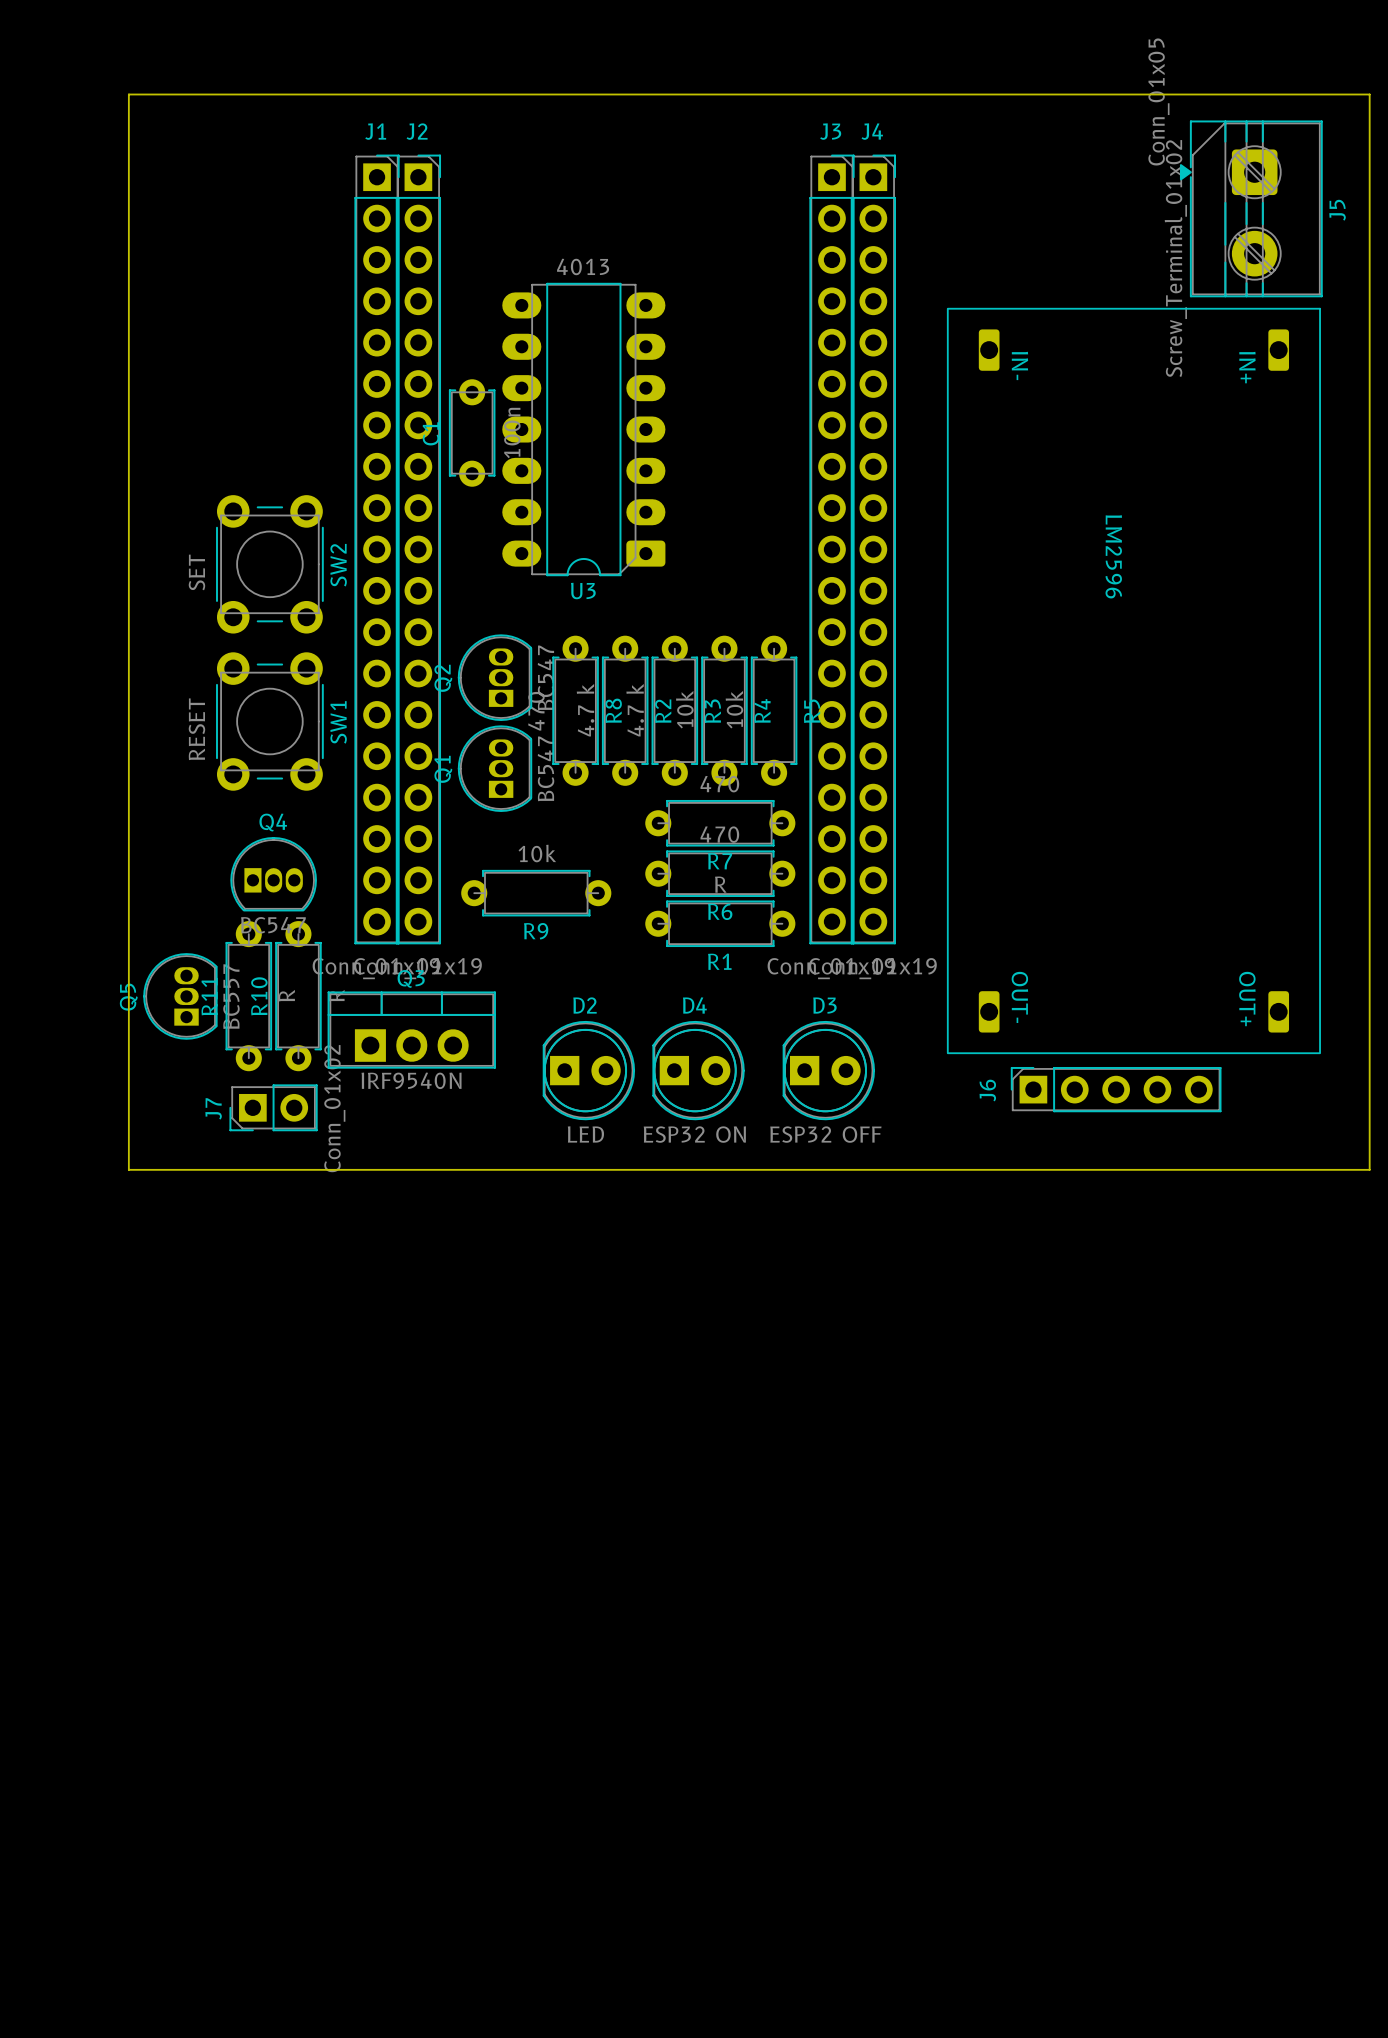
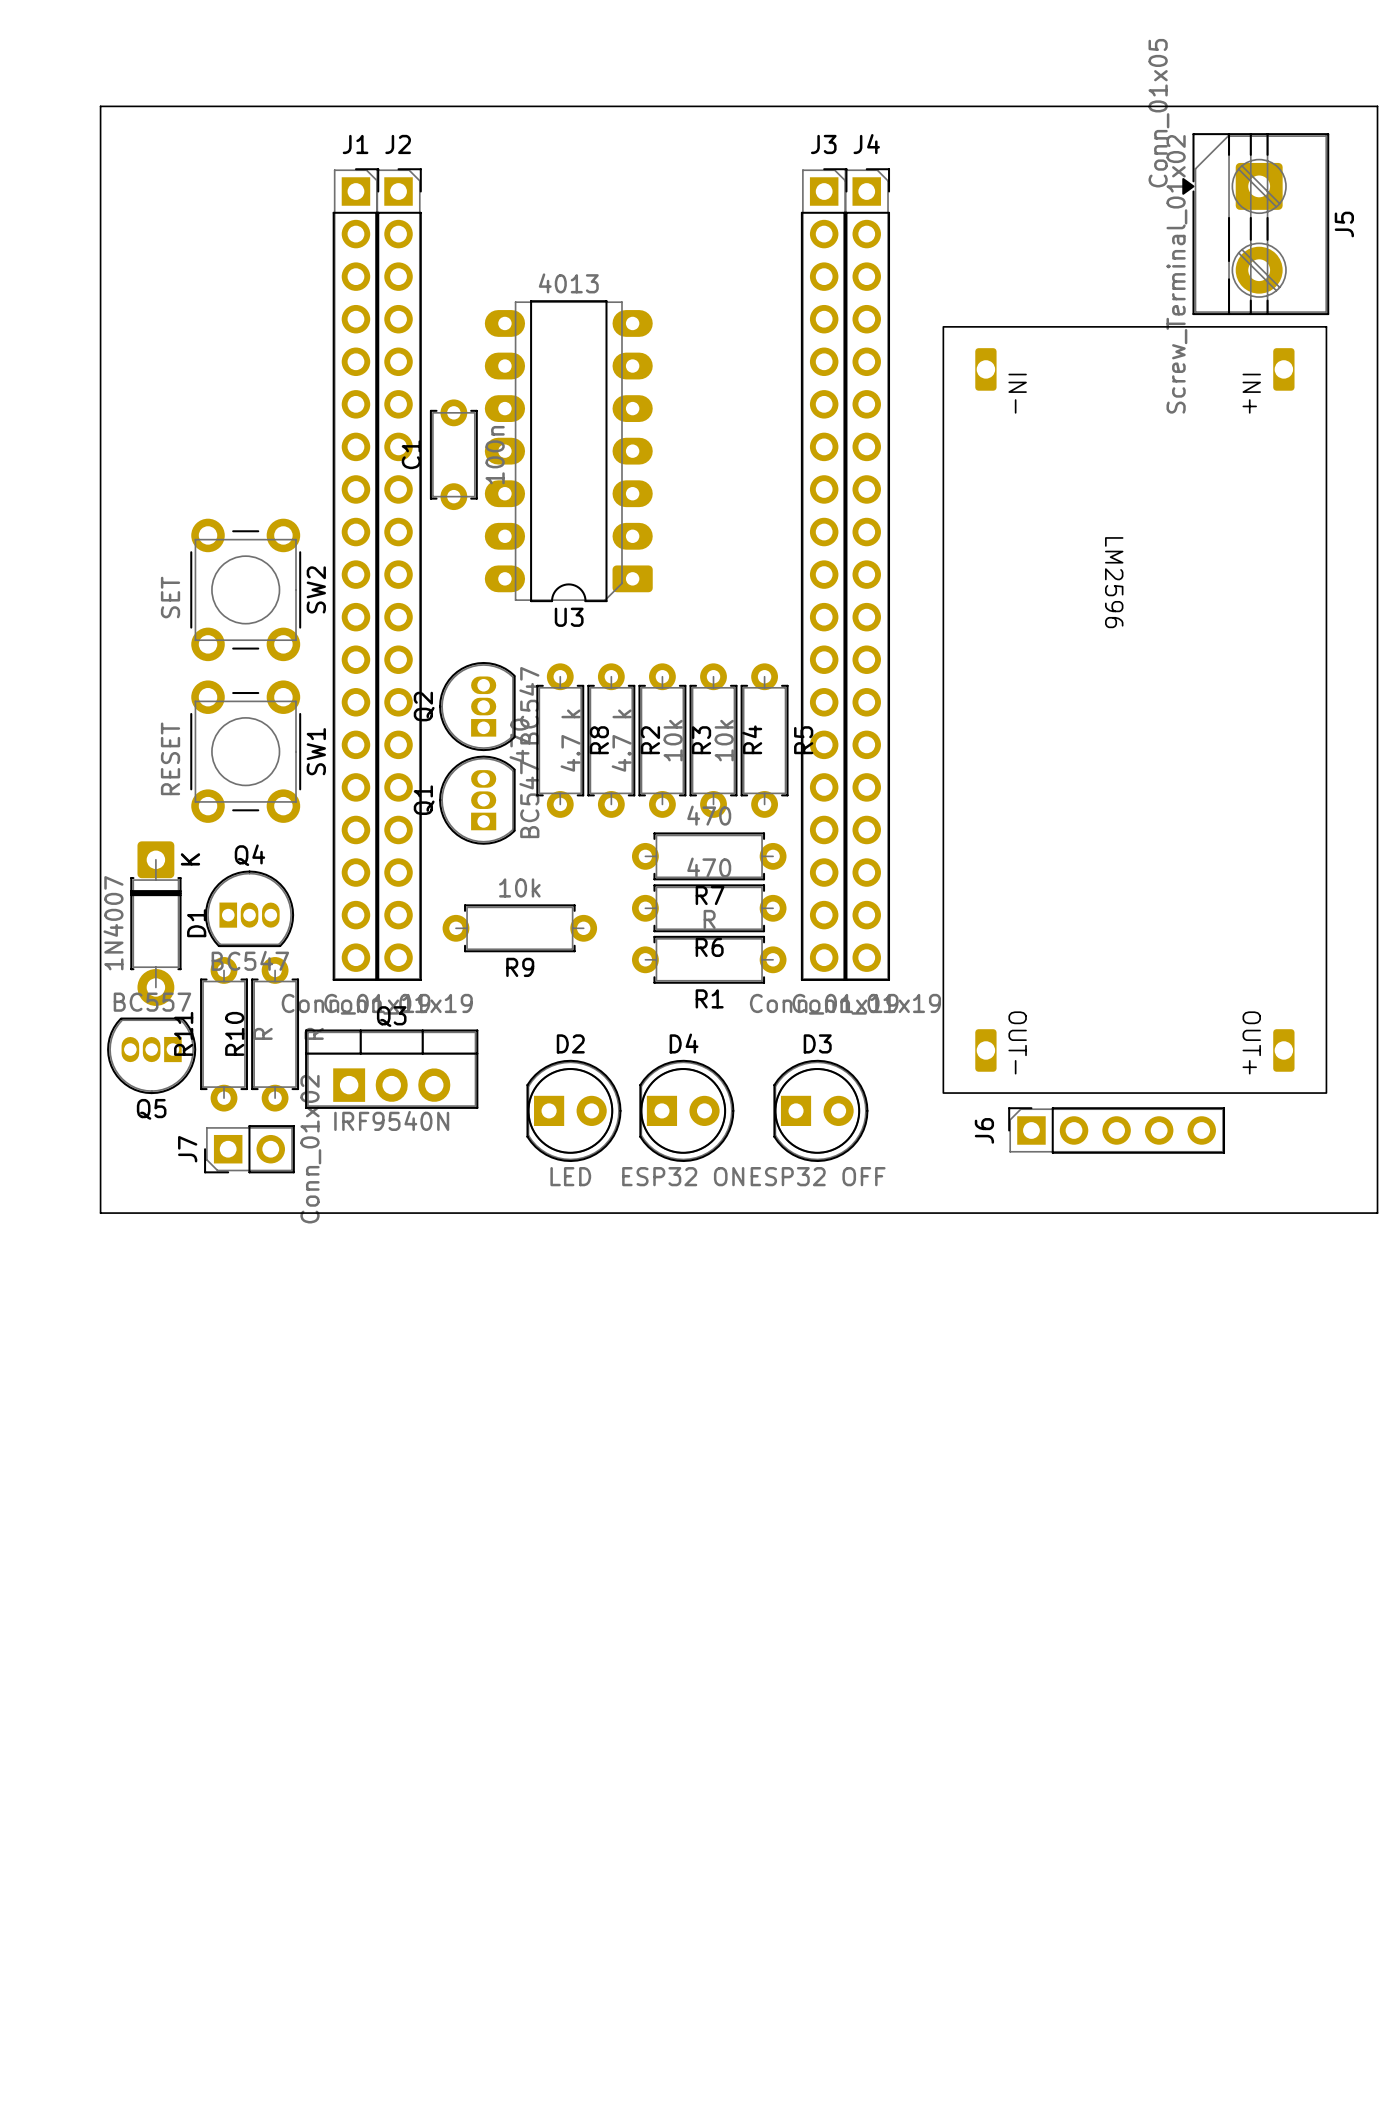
D1: none -> 1N4007 (155, 923)
Q5 rotation: 0° (180, 996) -> 90° counterclockwise (151, 1055)

